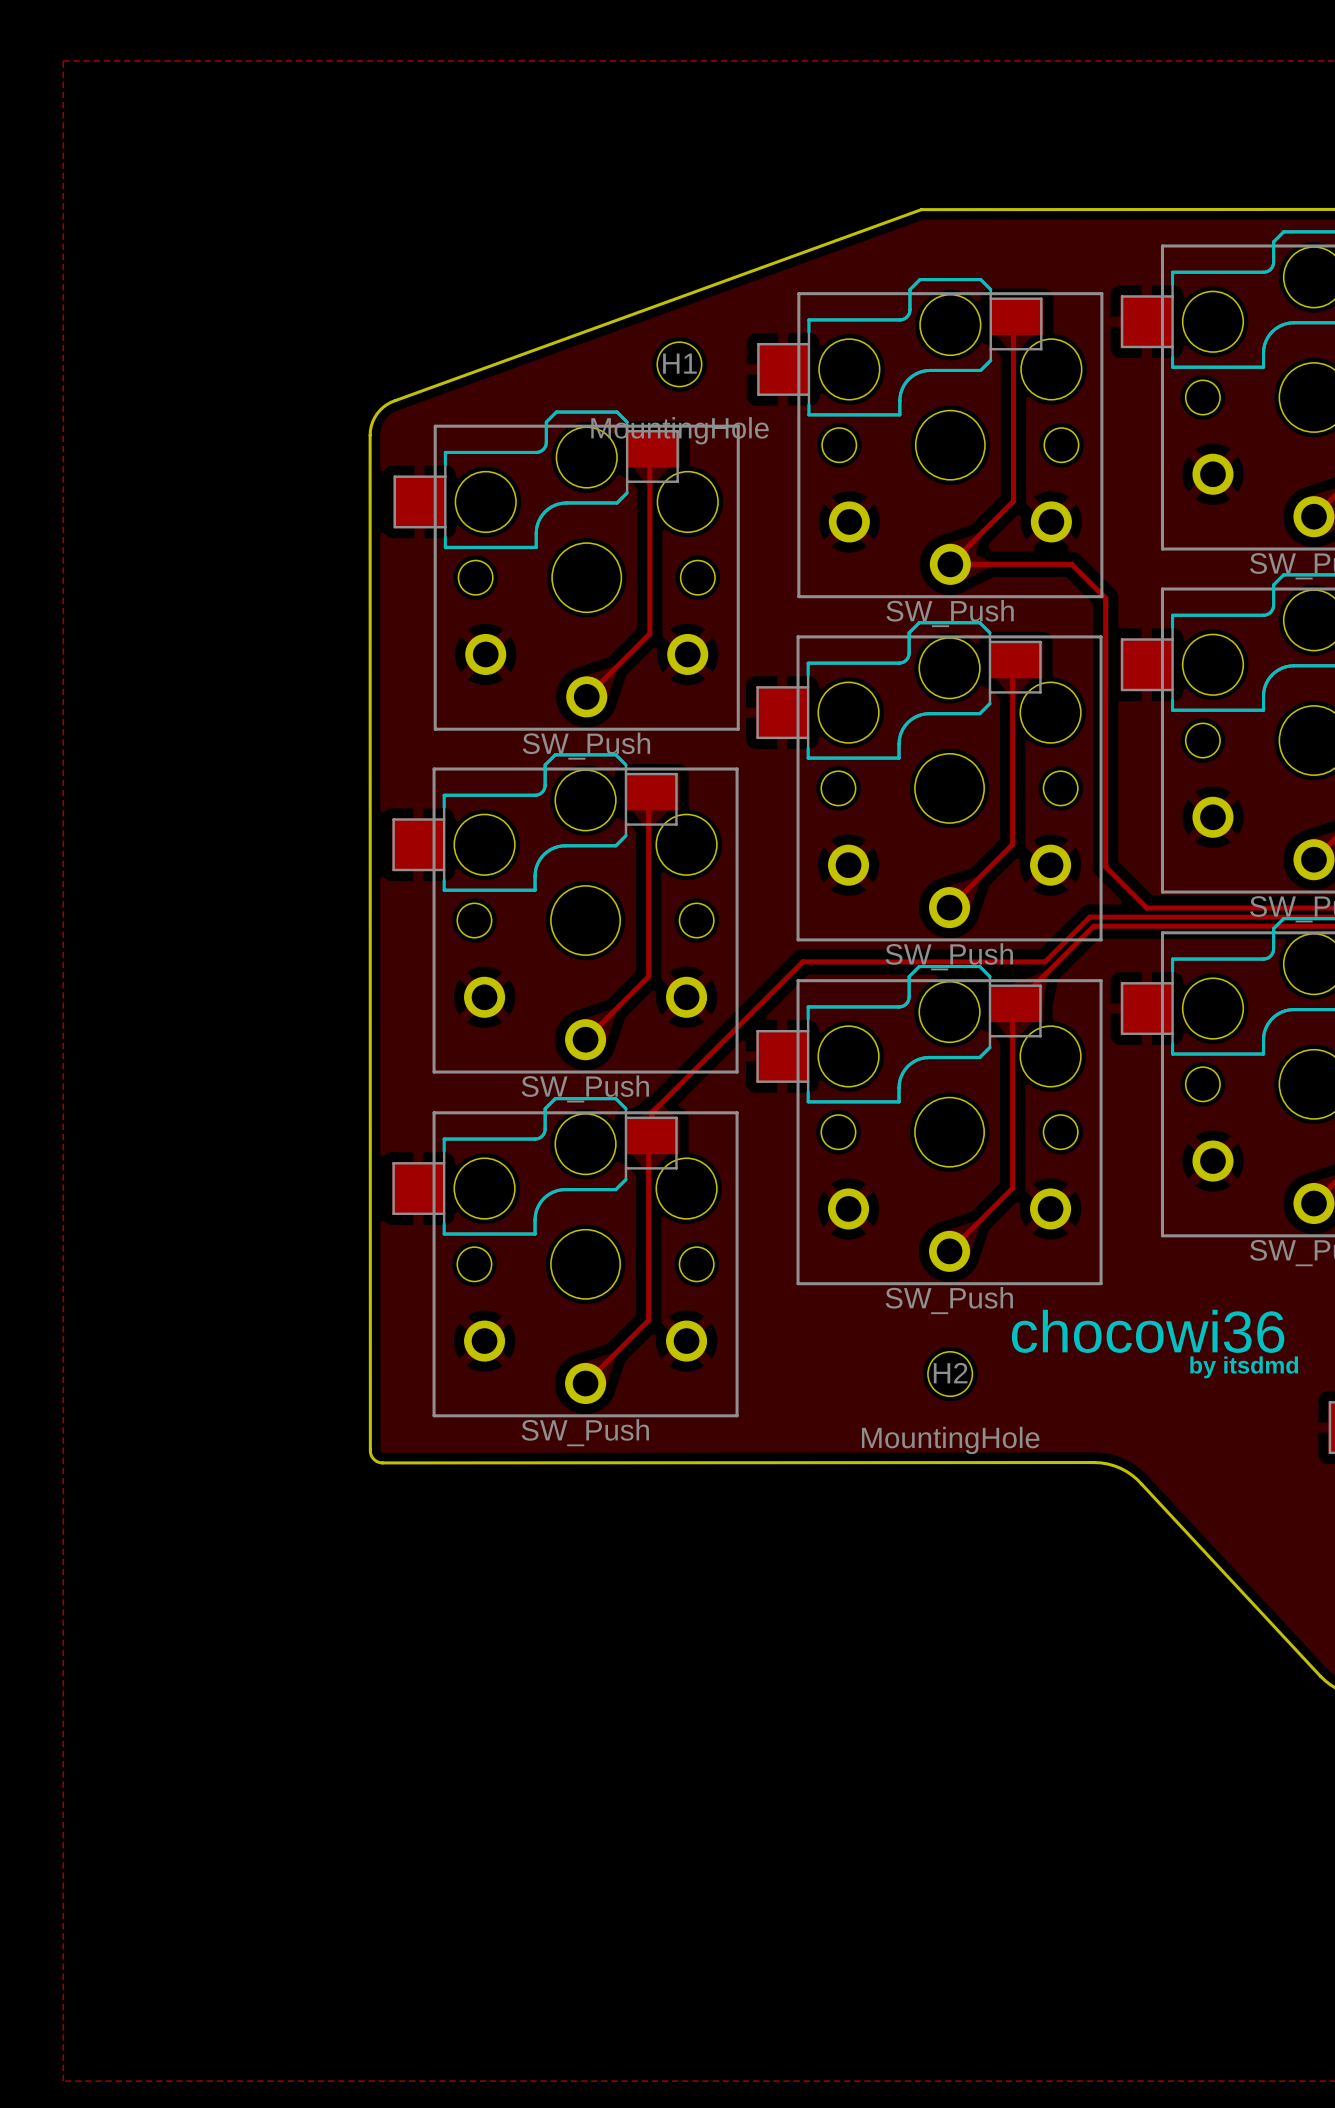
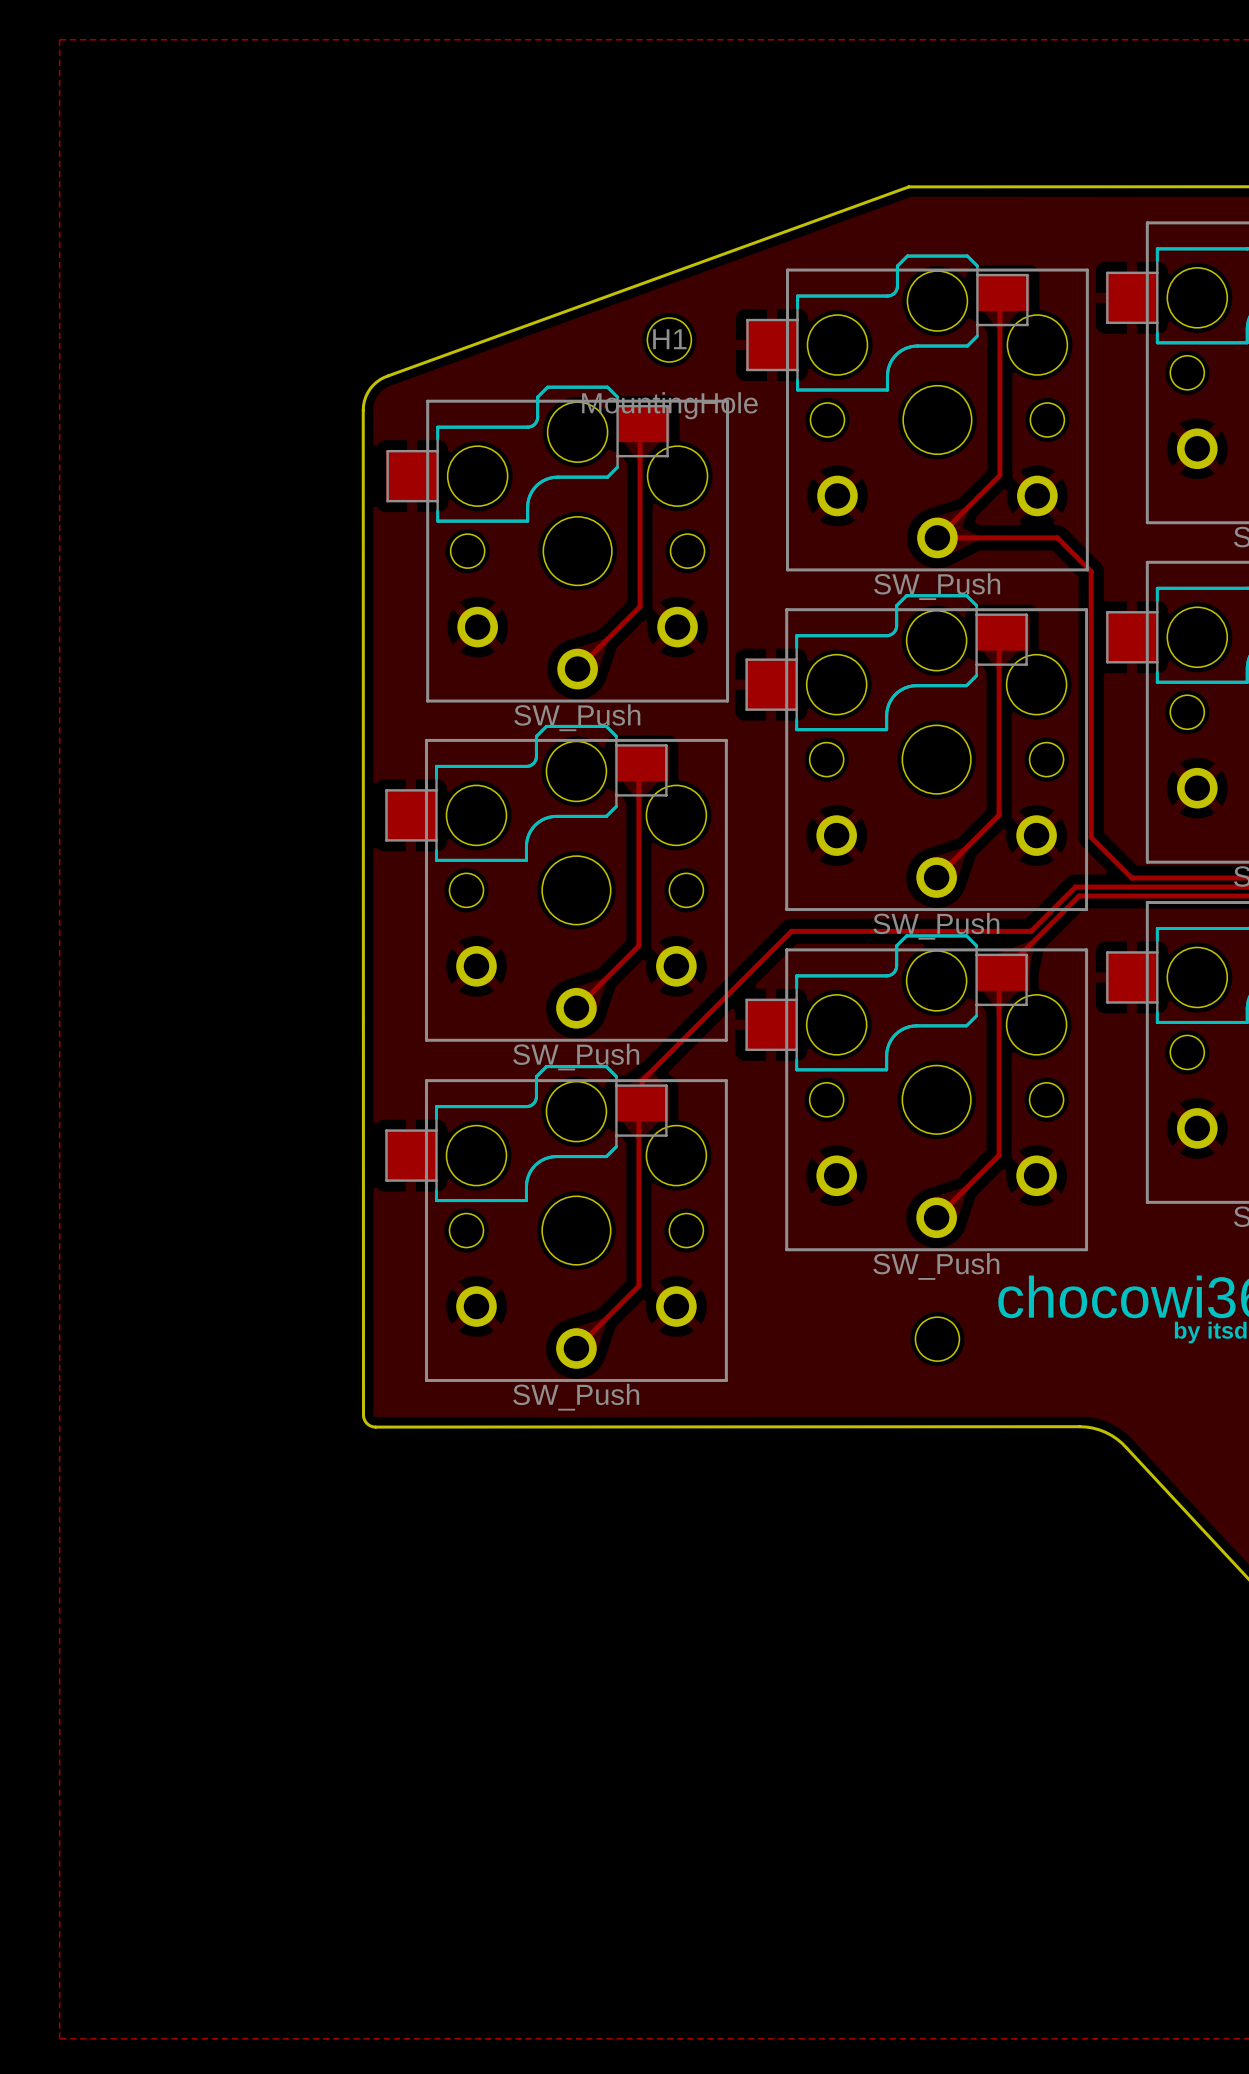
H2 name: H2 (950, 1373) -> none
H2 value: MountingHole (950, 1440) -> none

